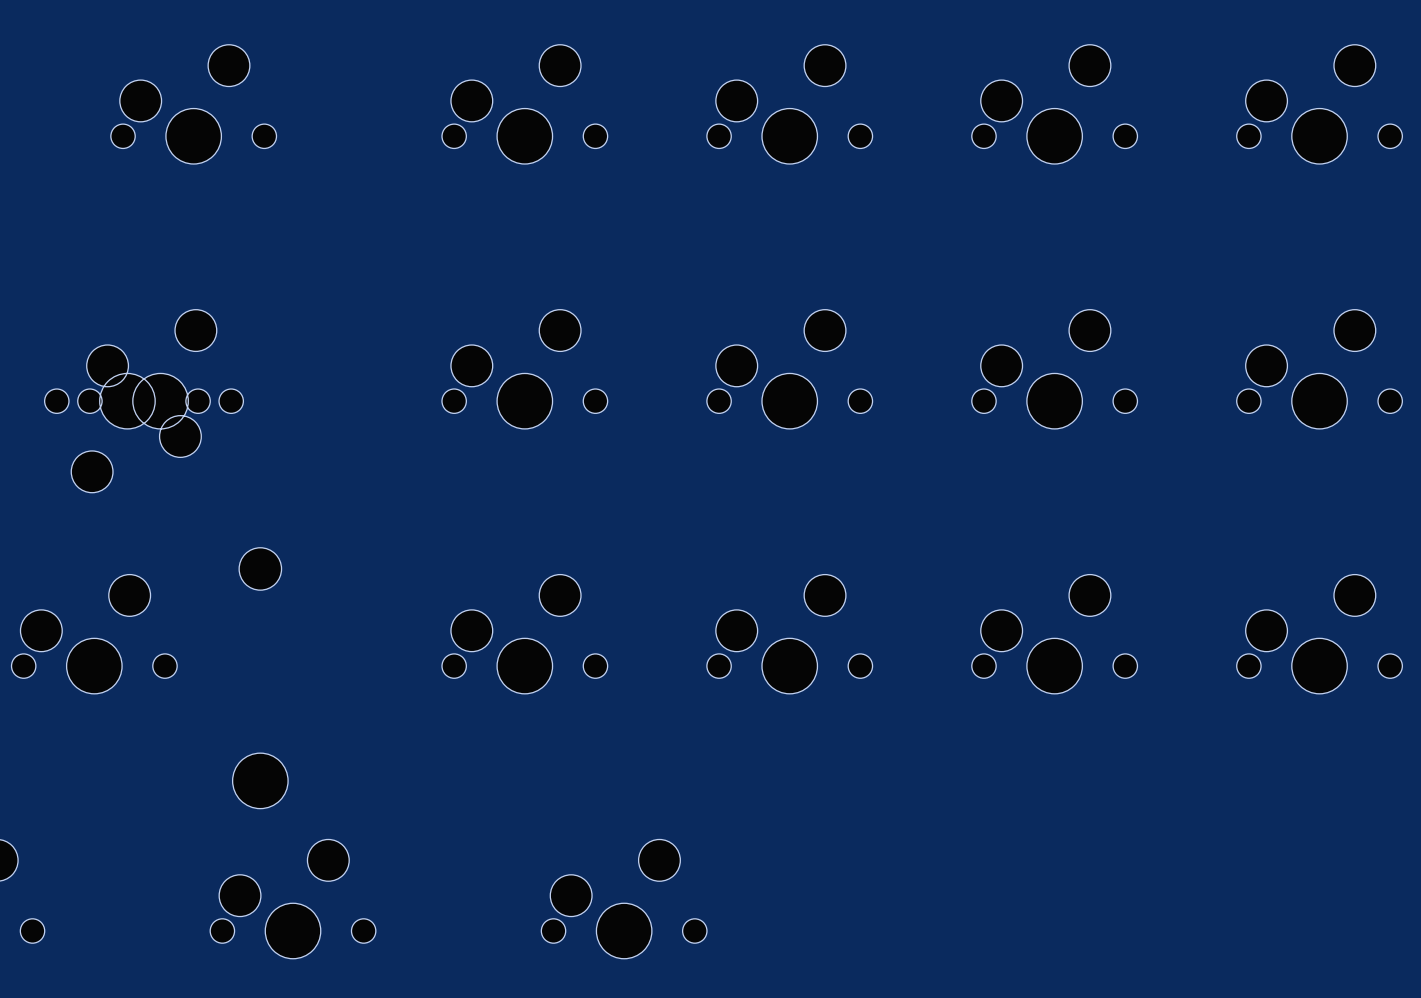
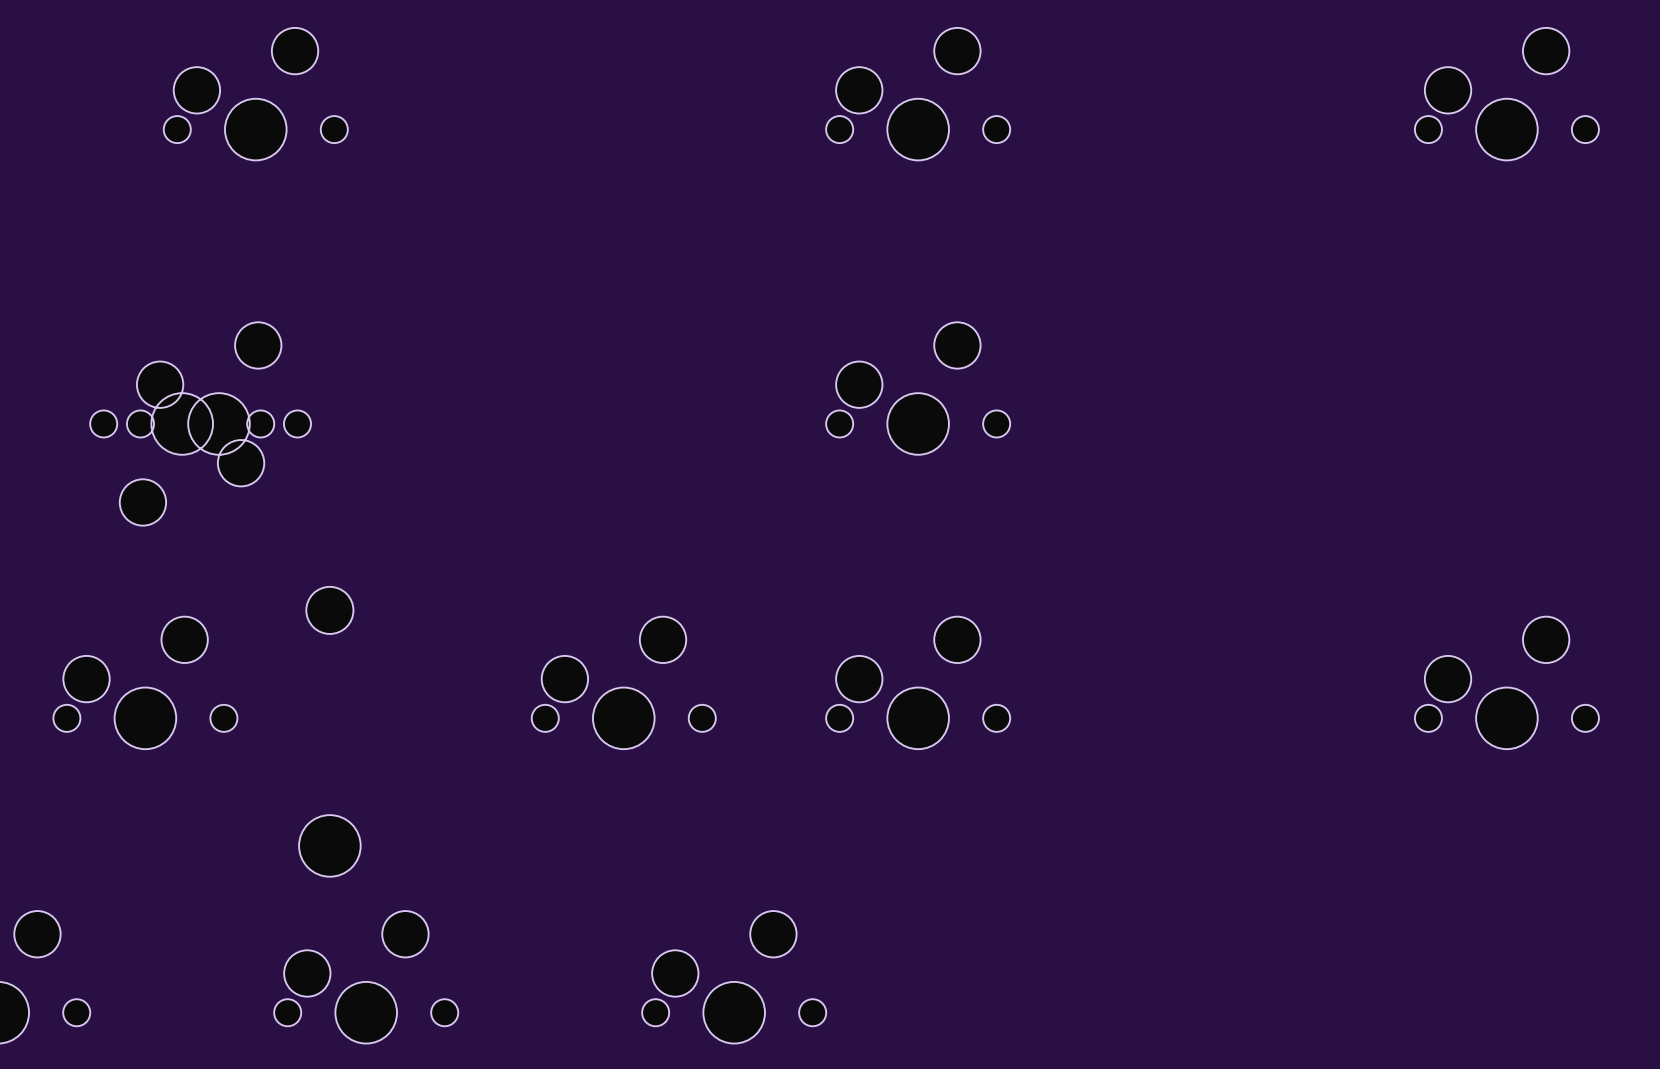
part: (524, 104) -> none
part: (1054, 104) -> none
part: (524, 369) -> none
part: (1054, 369) -> none
part: (1319, 369) -> none
part: (1054, 634) -> none

